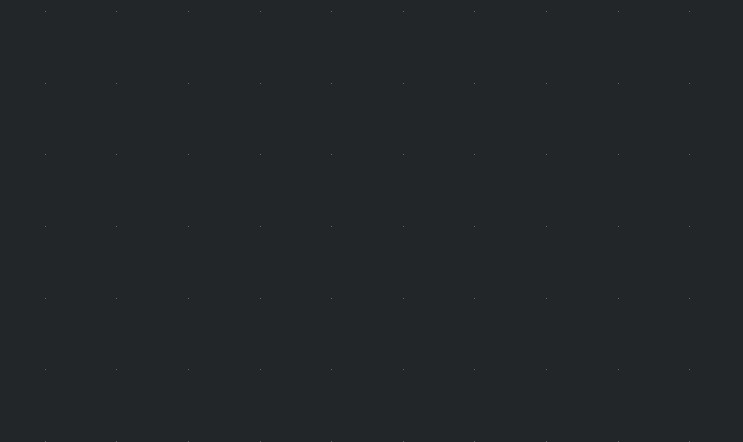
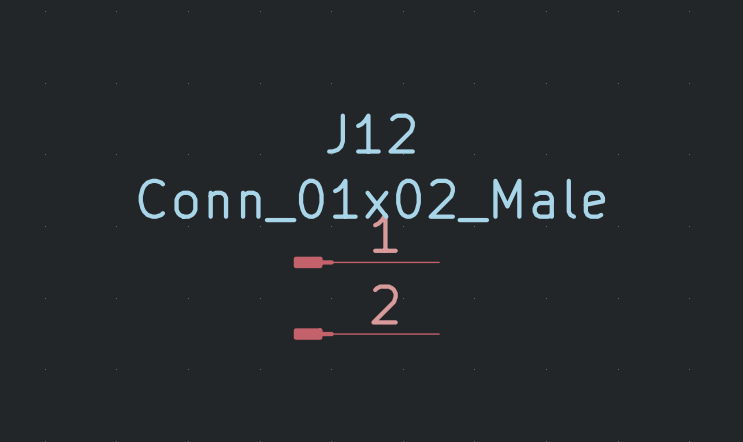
J12: none -> Conn_01x02_Male (366, 298)

